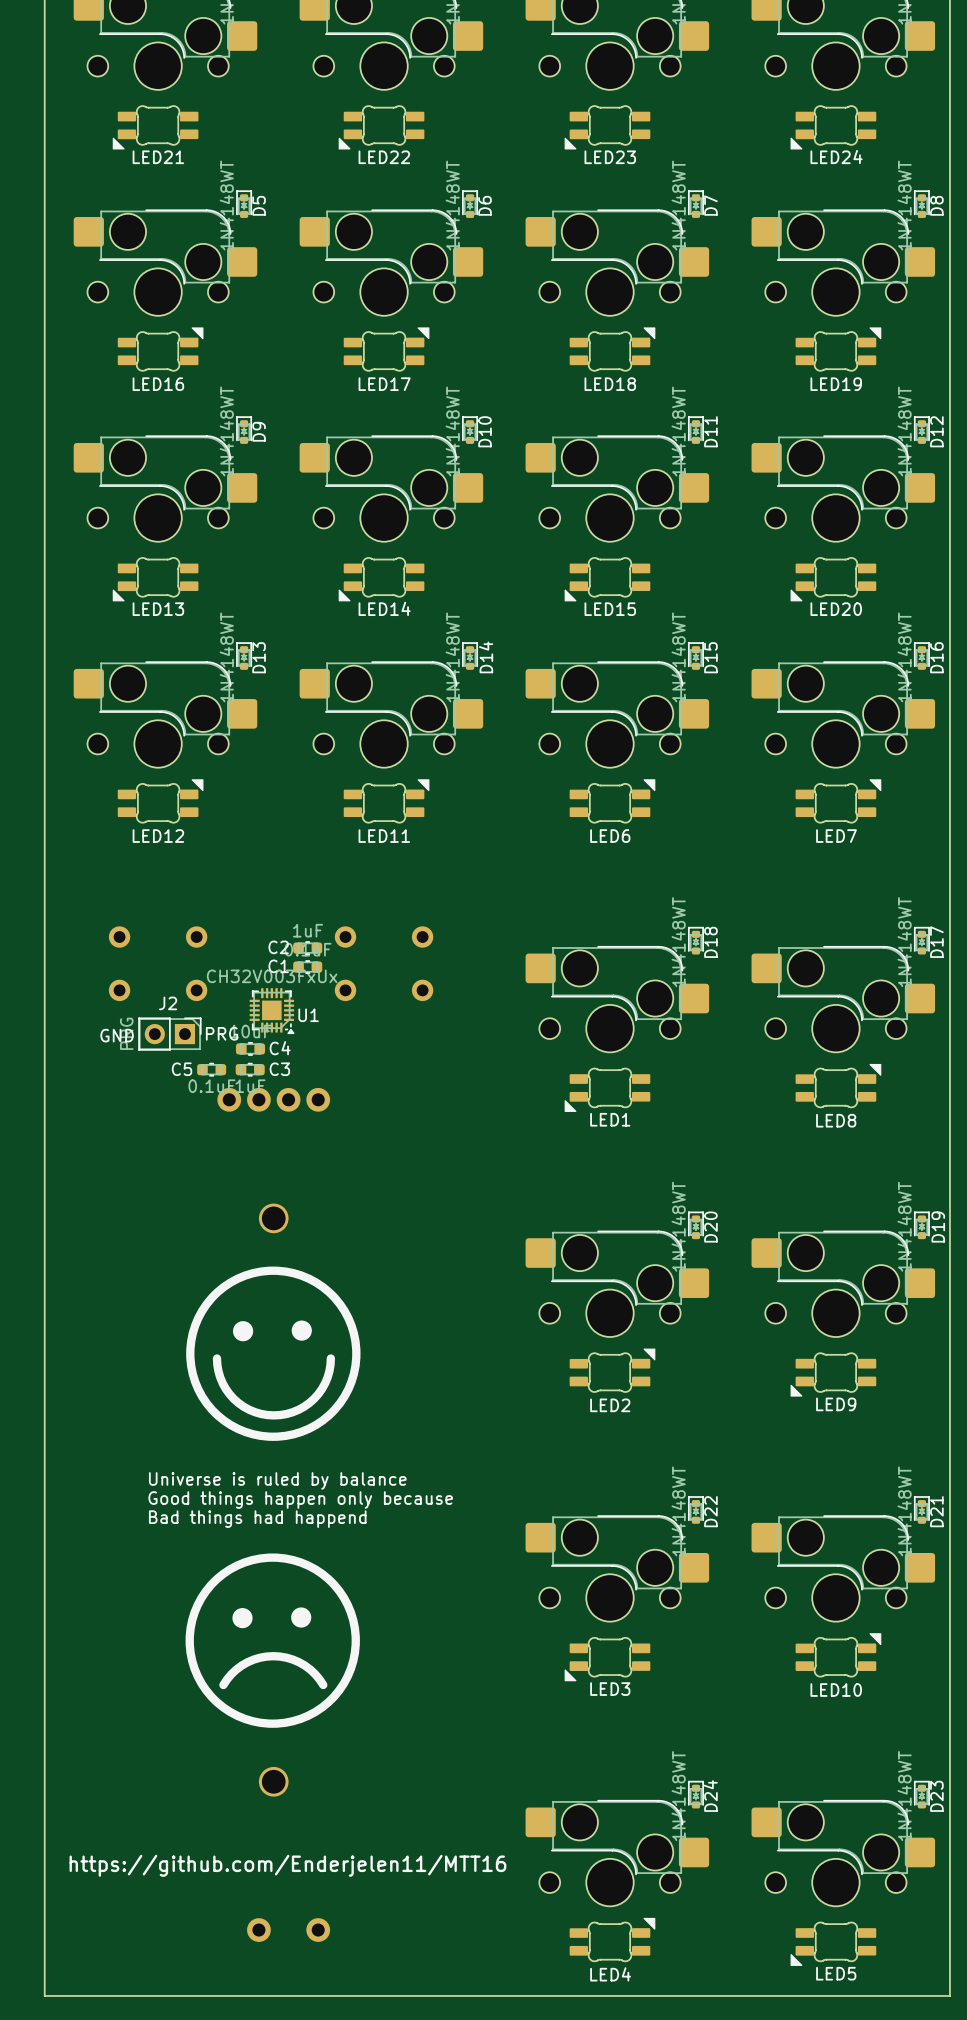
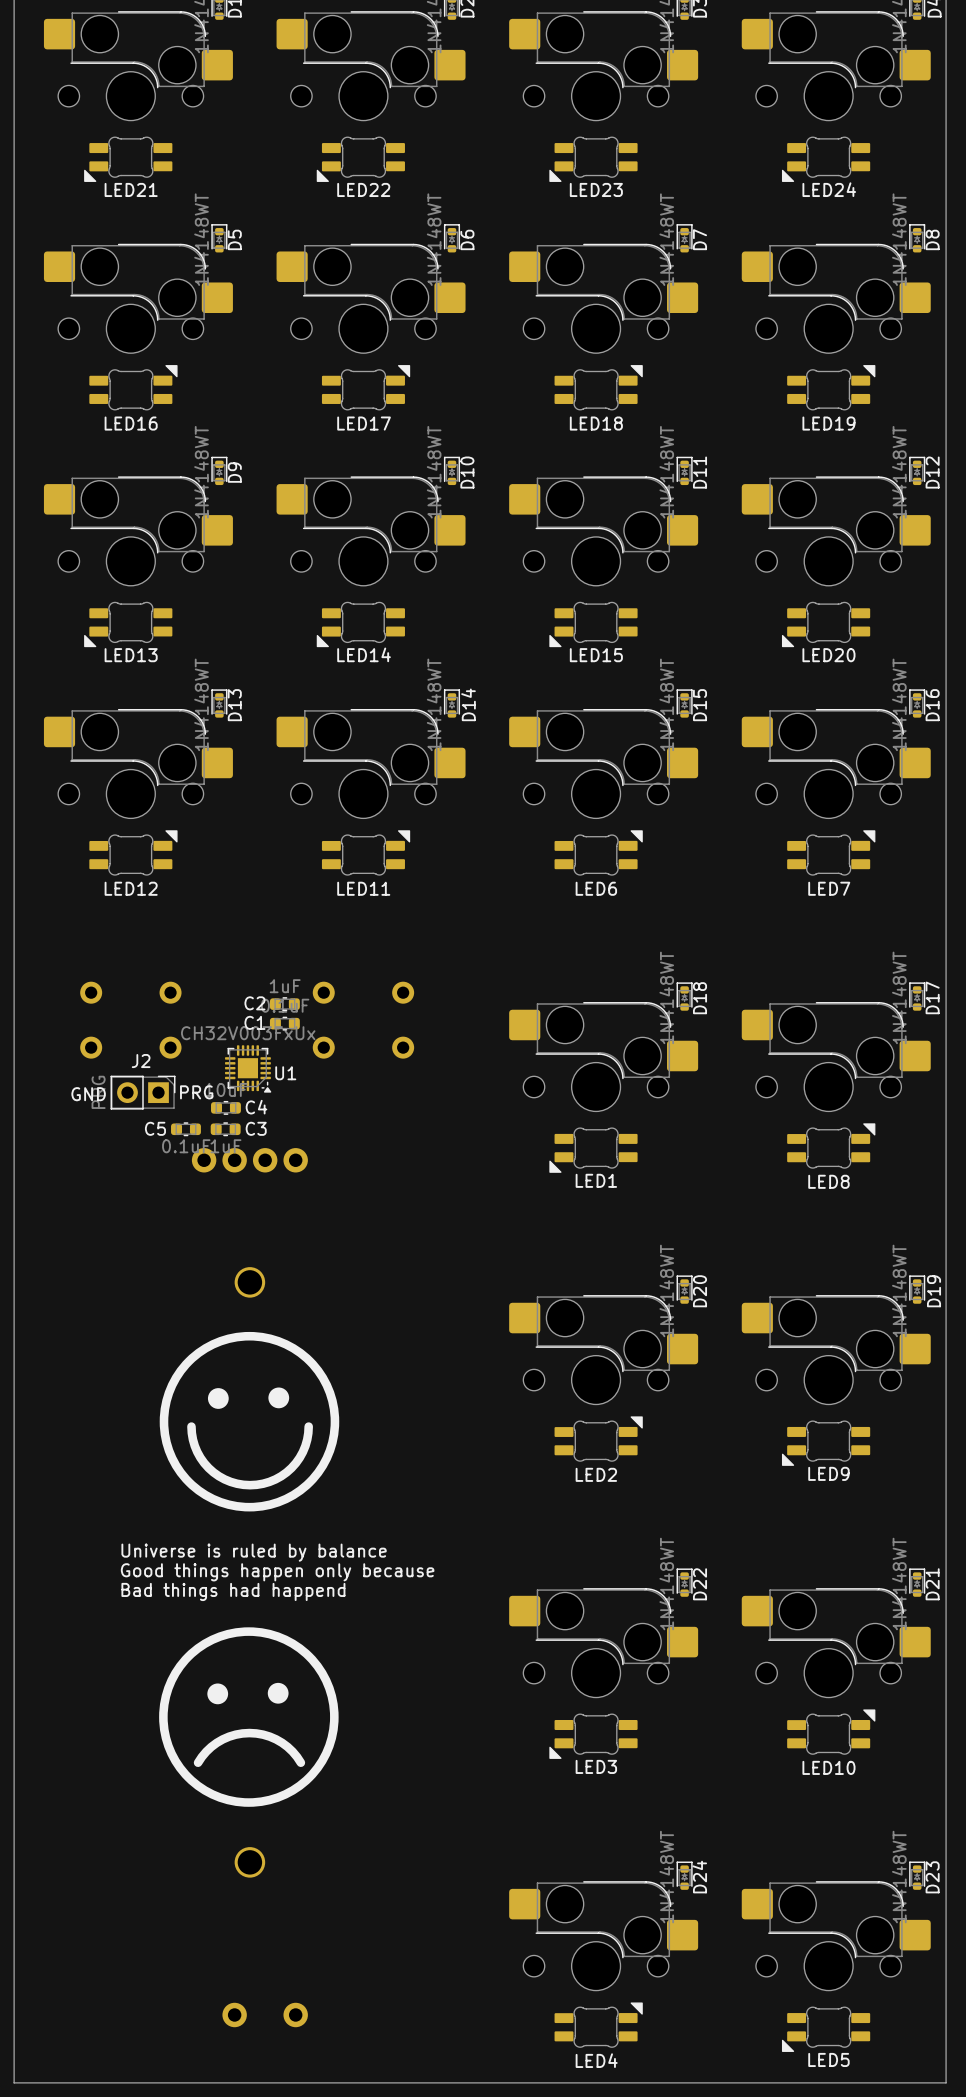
text: https://github.com/Enderjelen11/MTT16 (287, 1865) -> none

